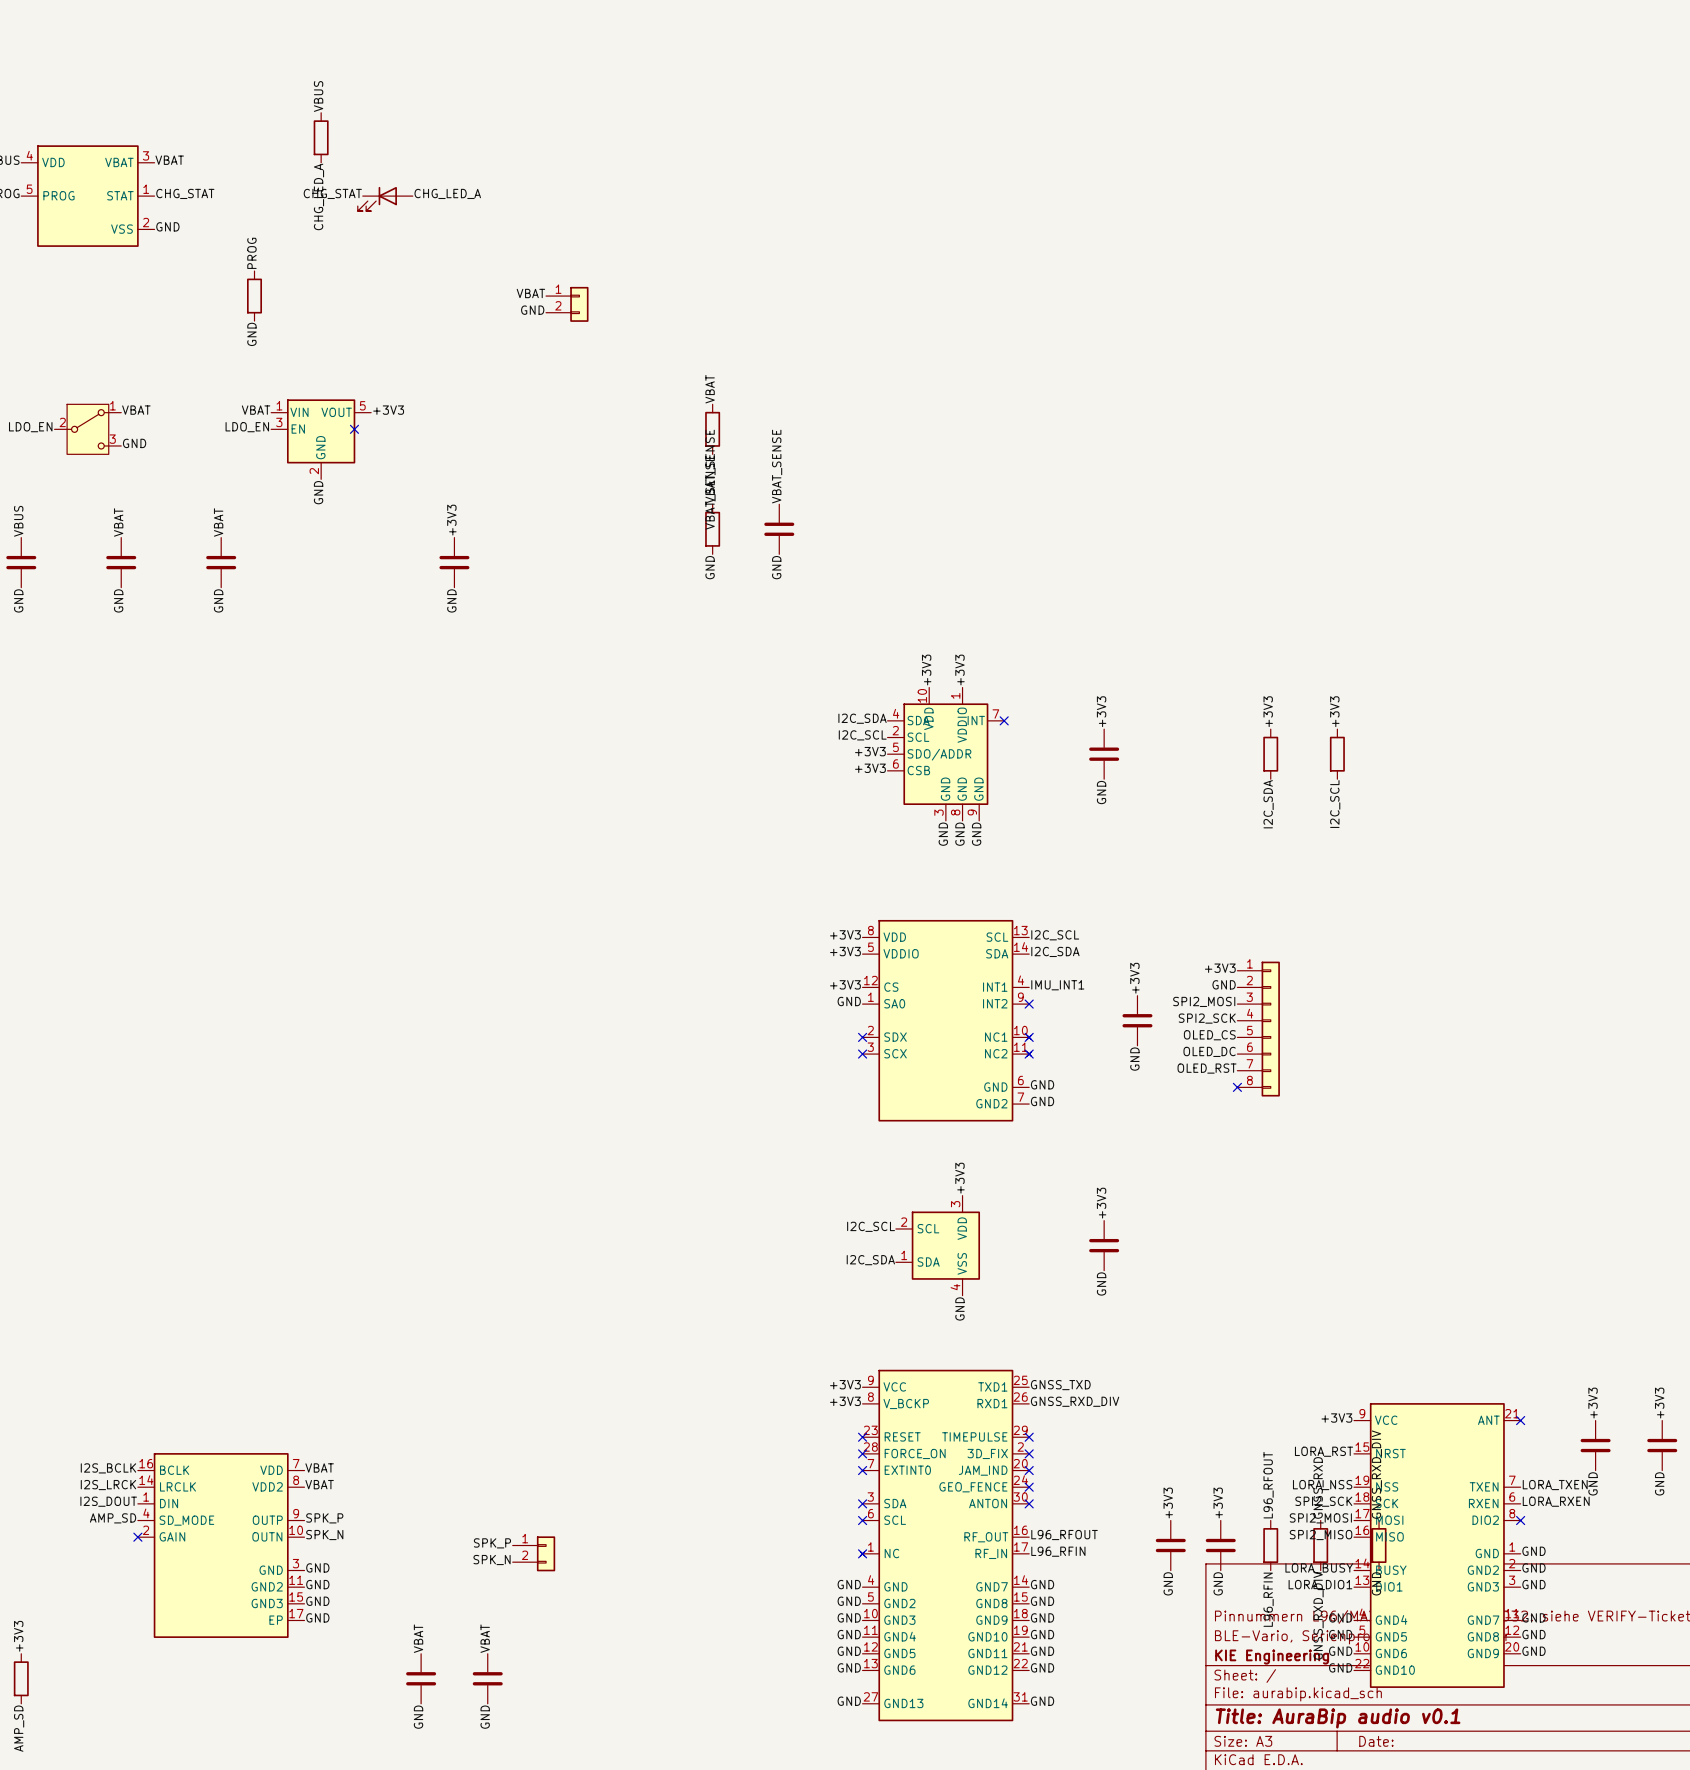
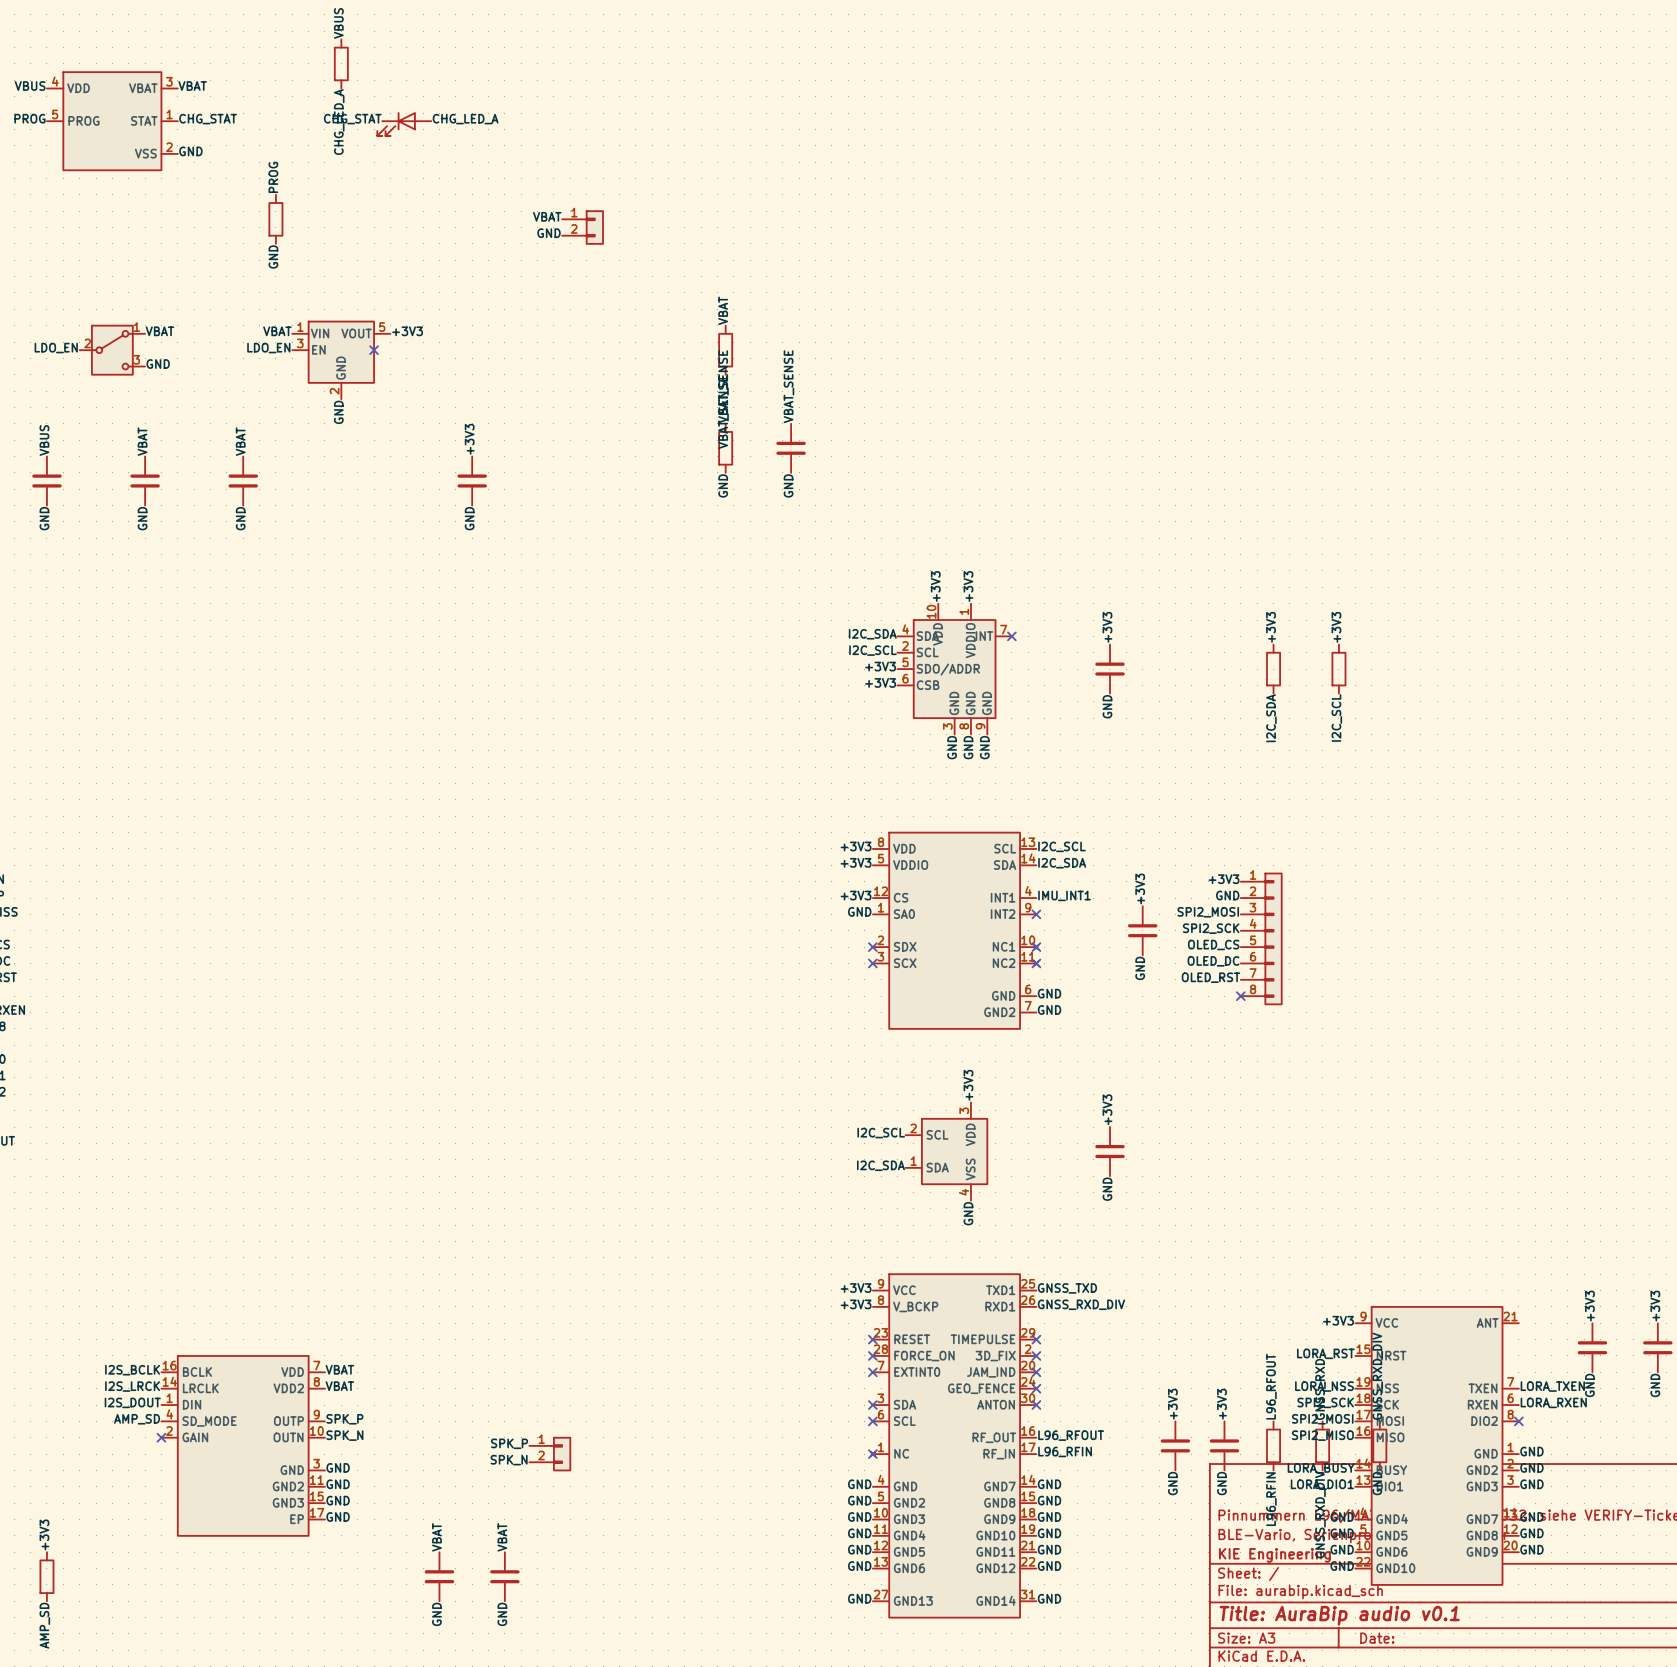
no-connect mark: (1520, 1420) -> none

